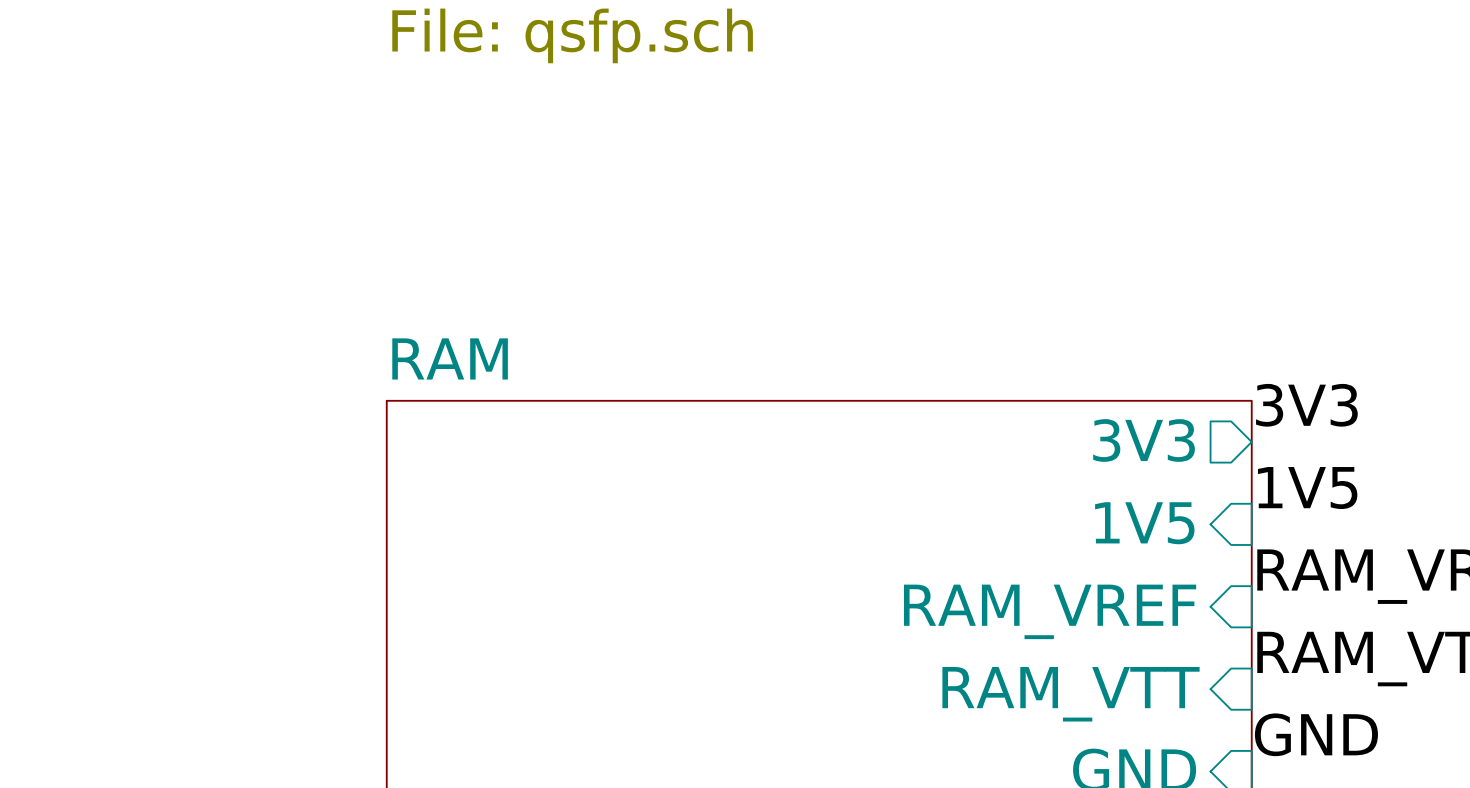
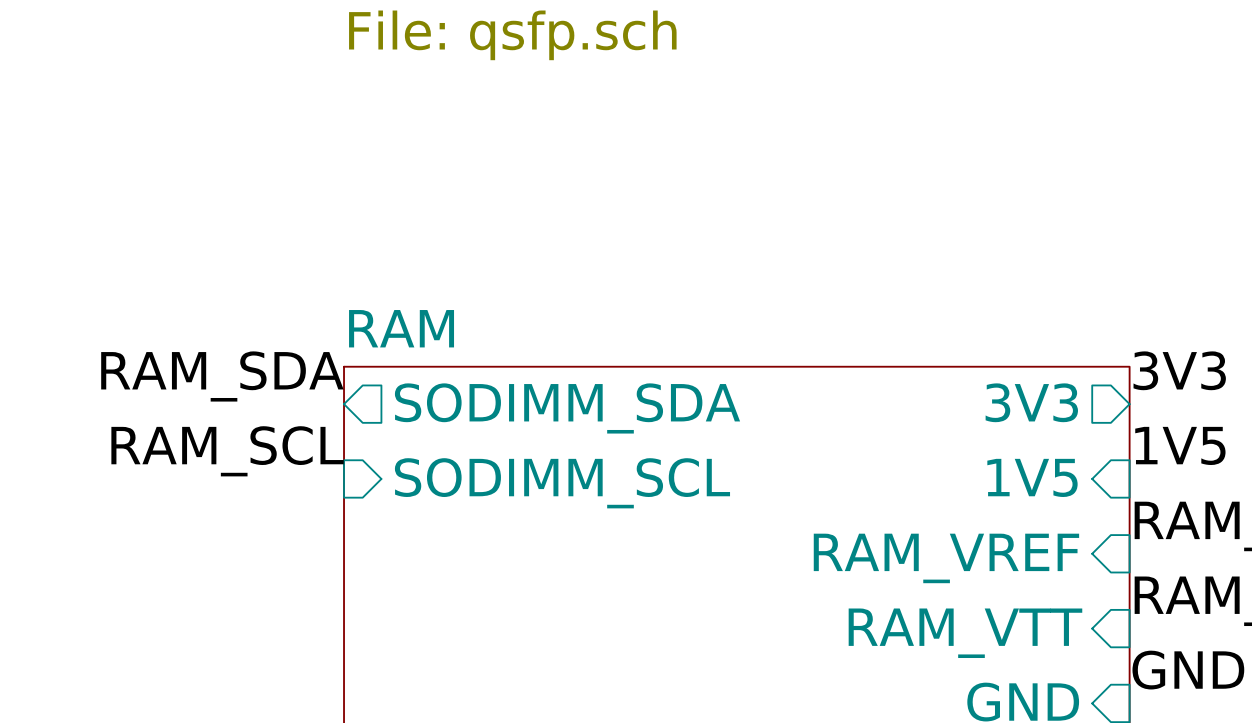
label: none -> RAM_SDA (222, 376)
sheet pin: none -> SODIMM_SDA (567, 408)
label: none -> RAM_SCL (227, 451)
sheet pin: none -> SODIMM_SCL (562, 483)

